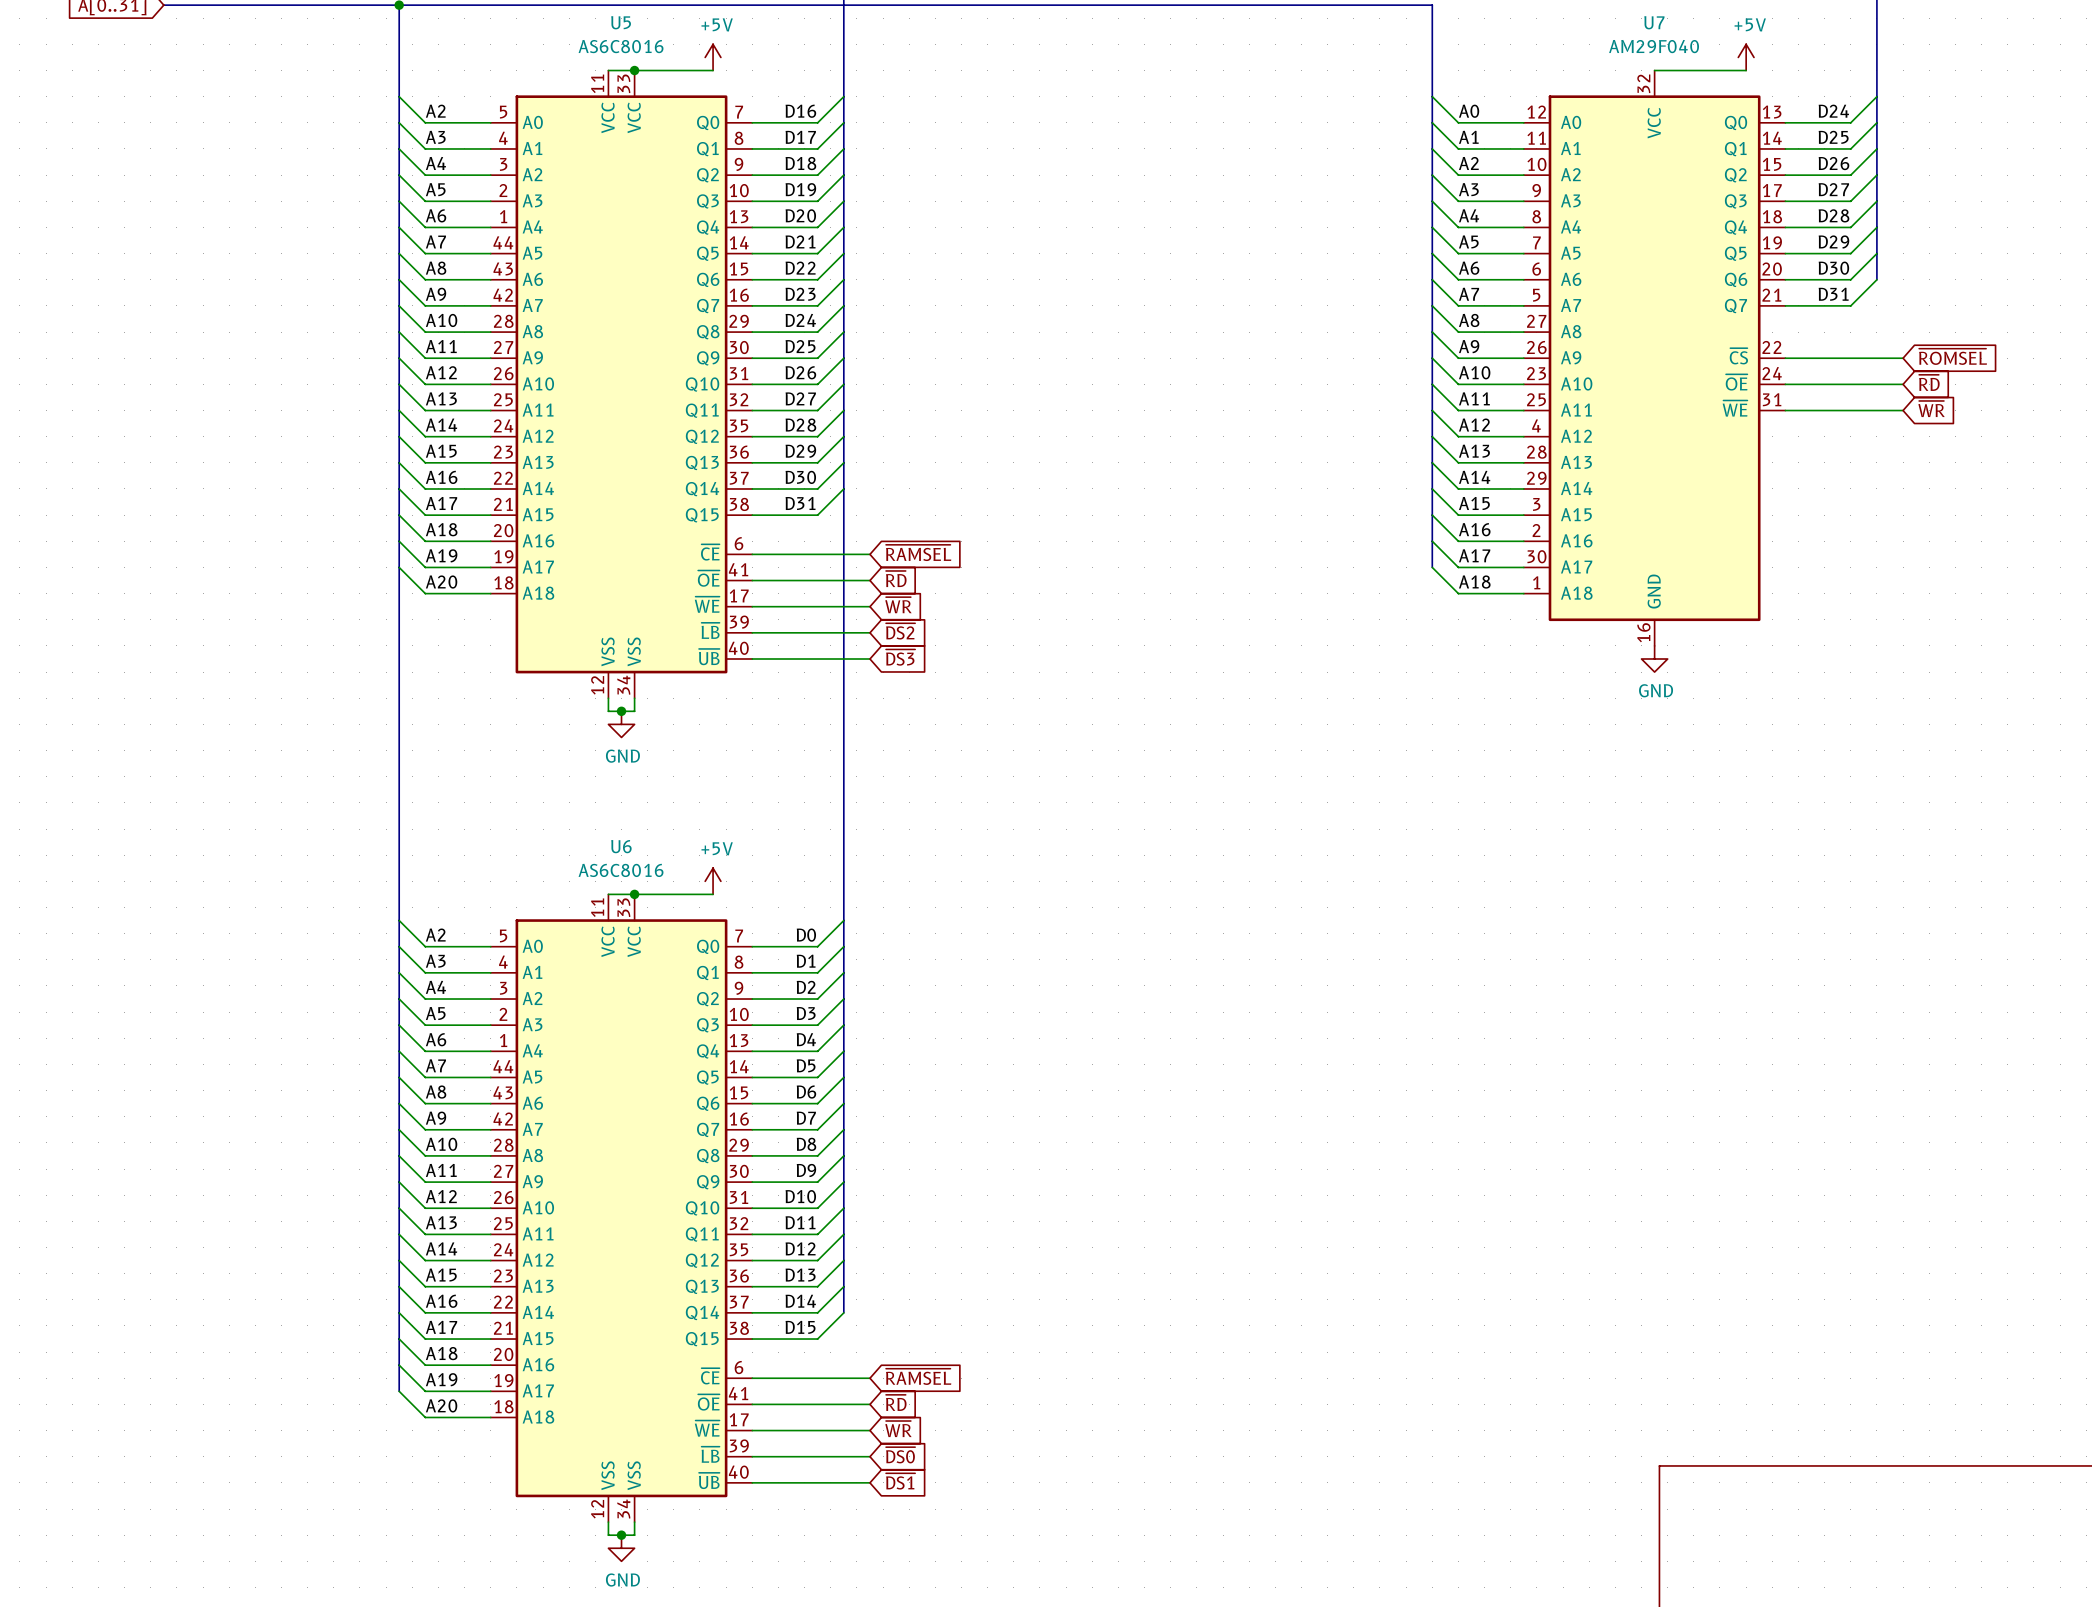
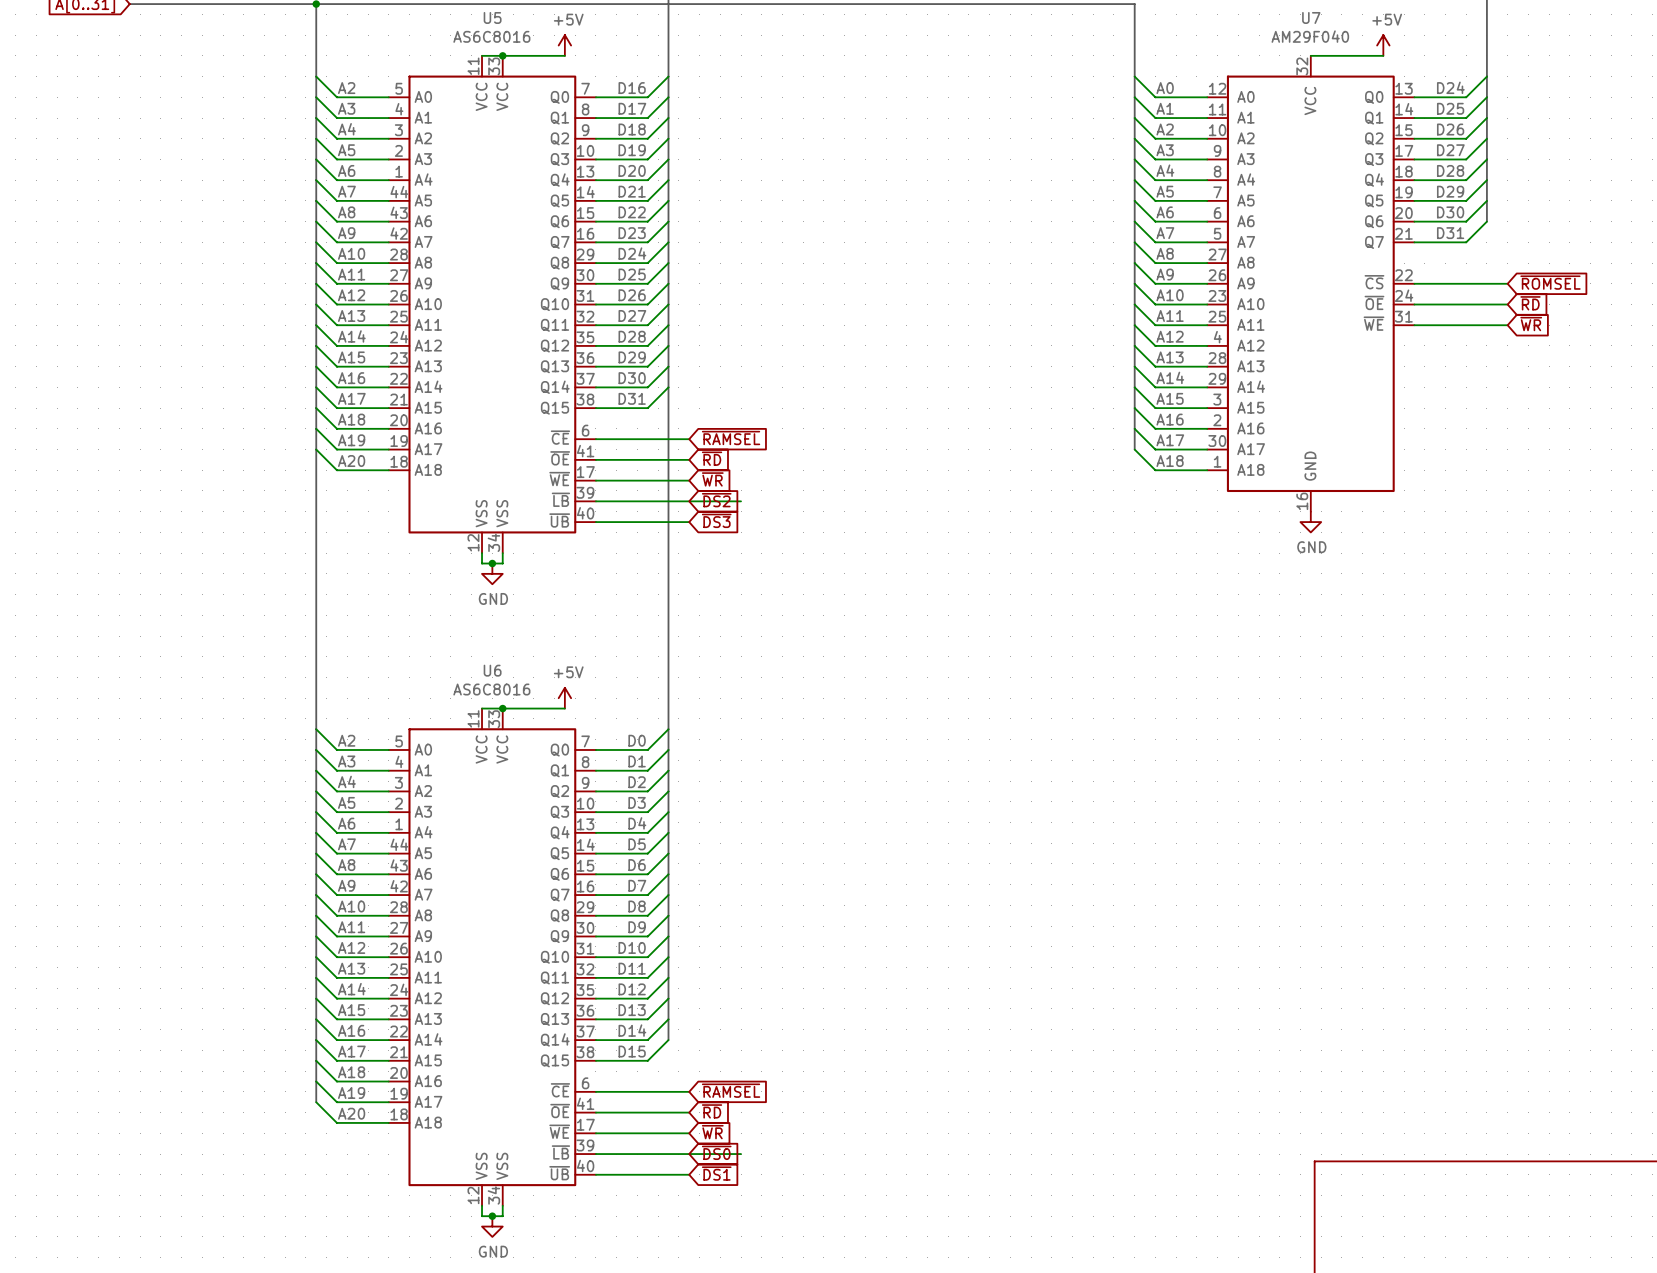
wire: none -> (689, 501) (741, 501)
wire: none -> (689, 1154) (741, 1154)

